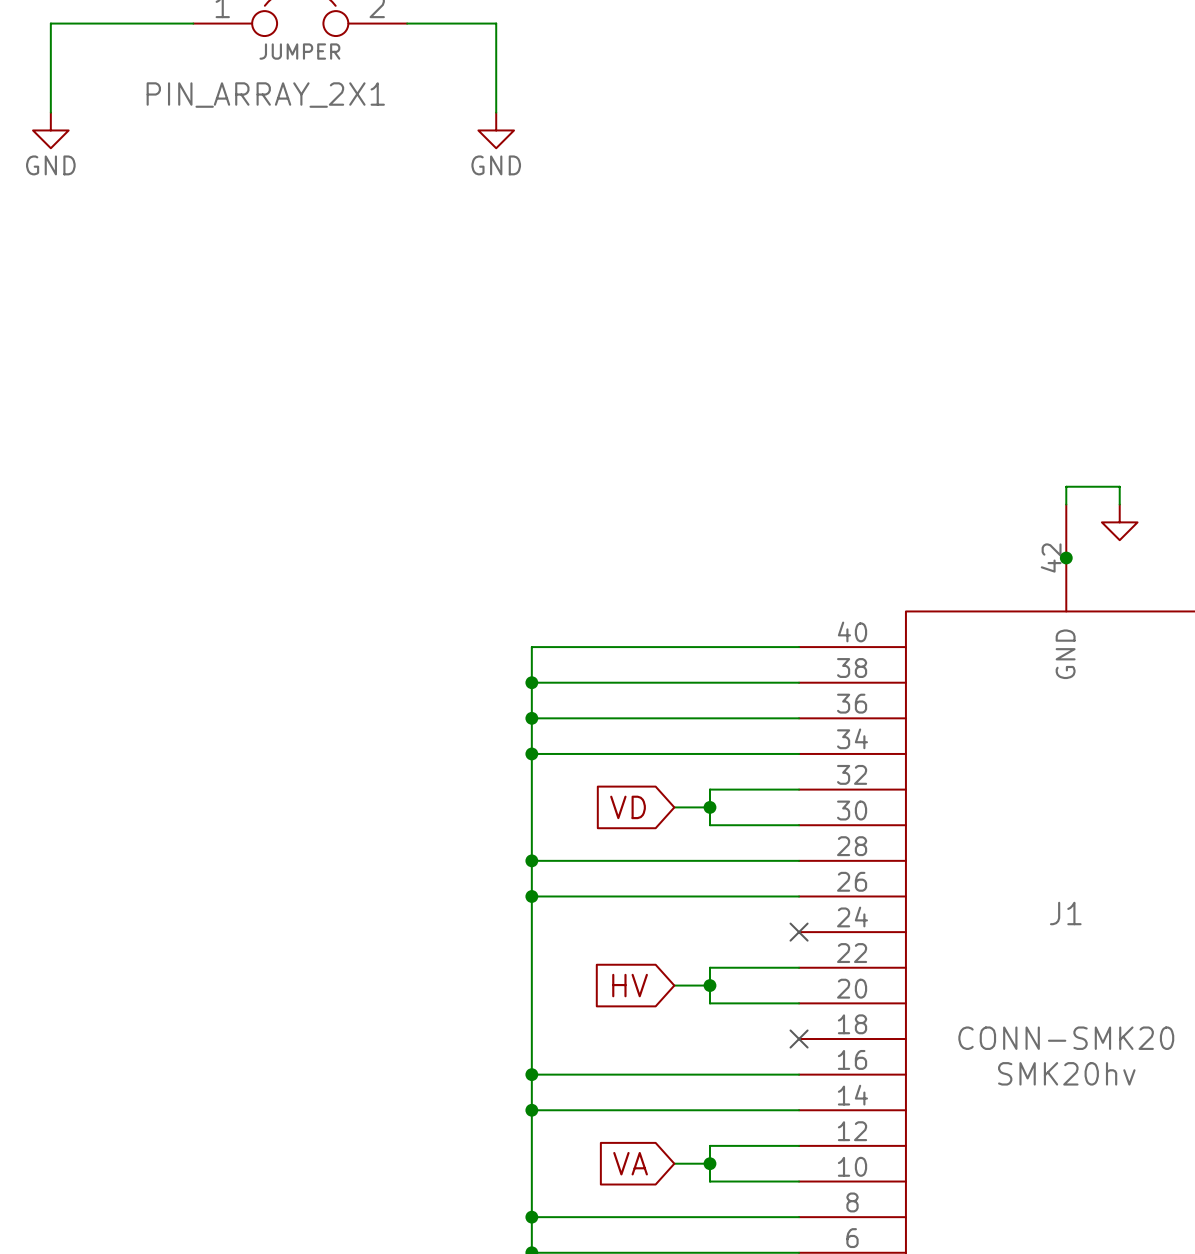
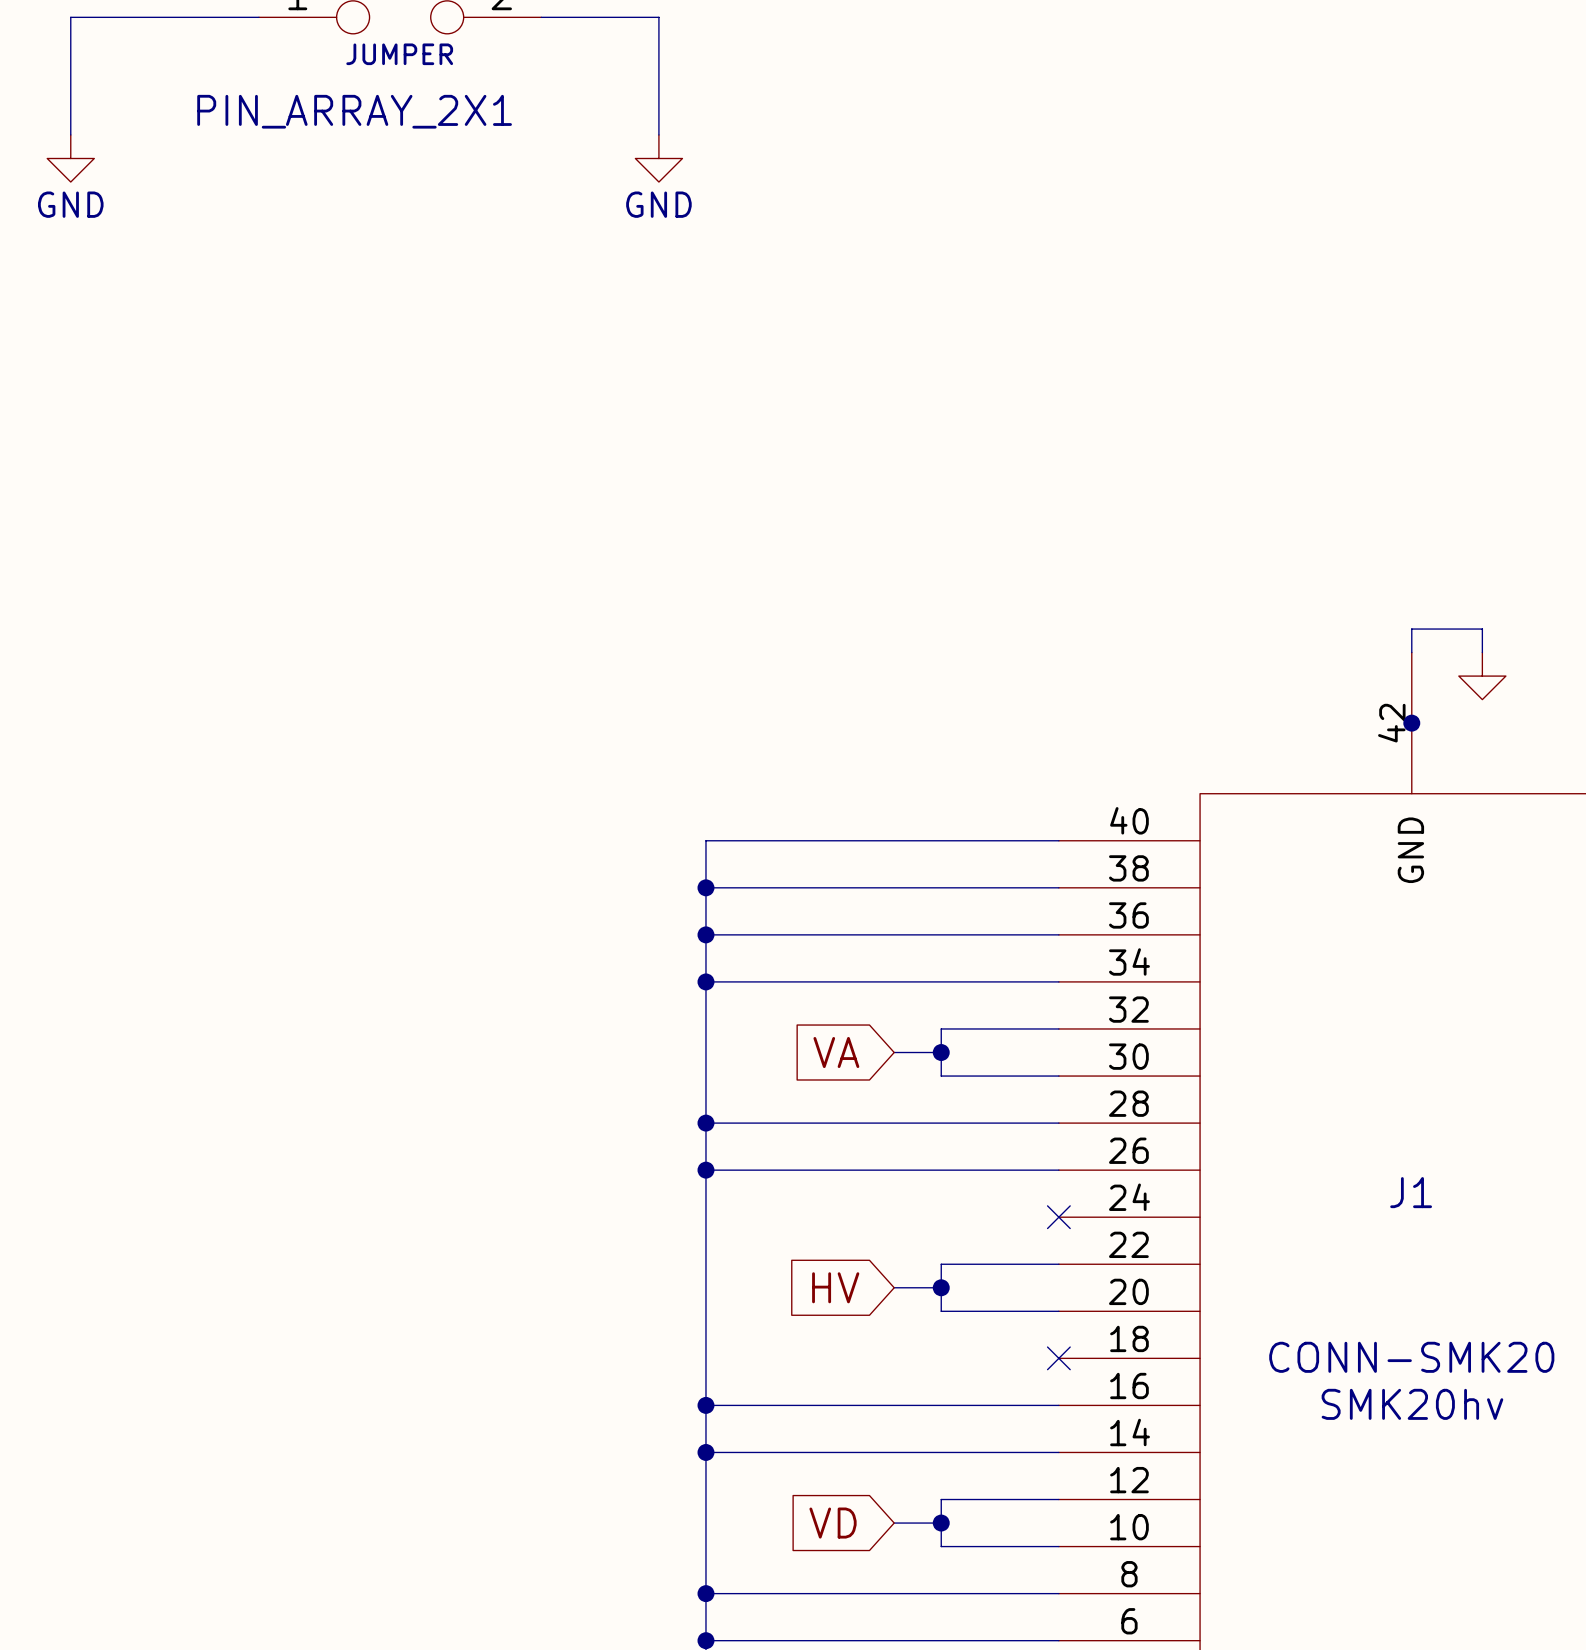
global label: VD (628, 807) -> VA (836, 1052)
global label: VA (630, 1163) -> VD (833, 1523)

